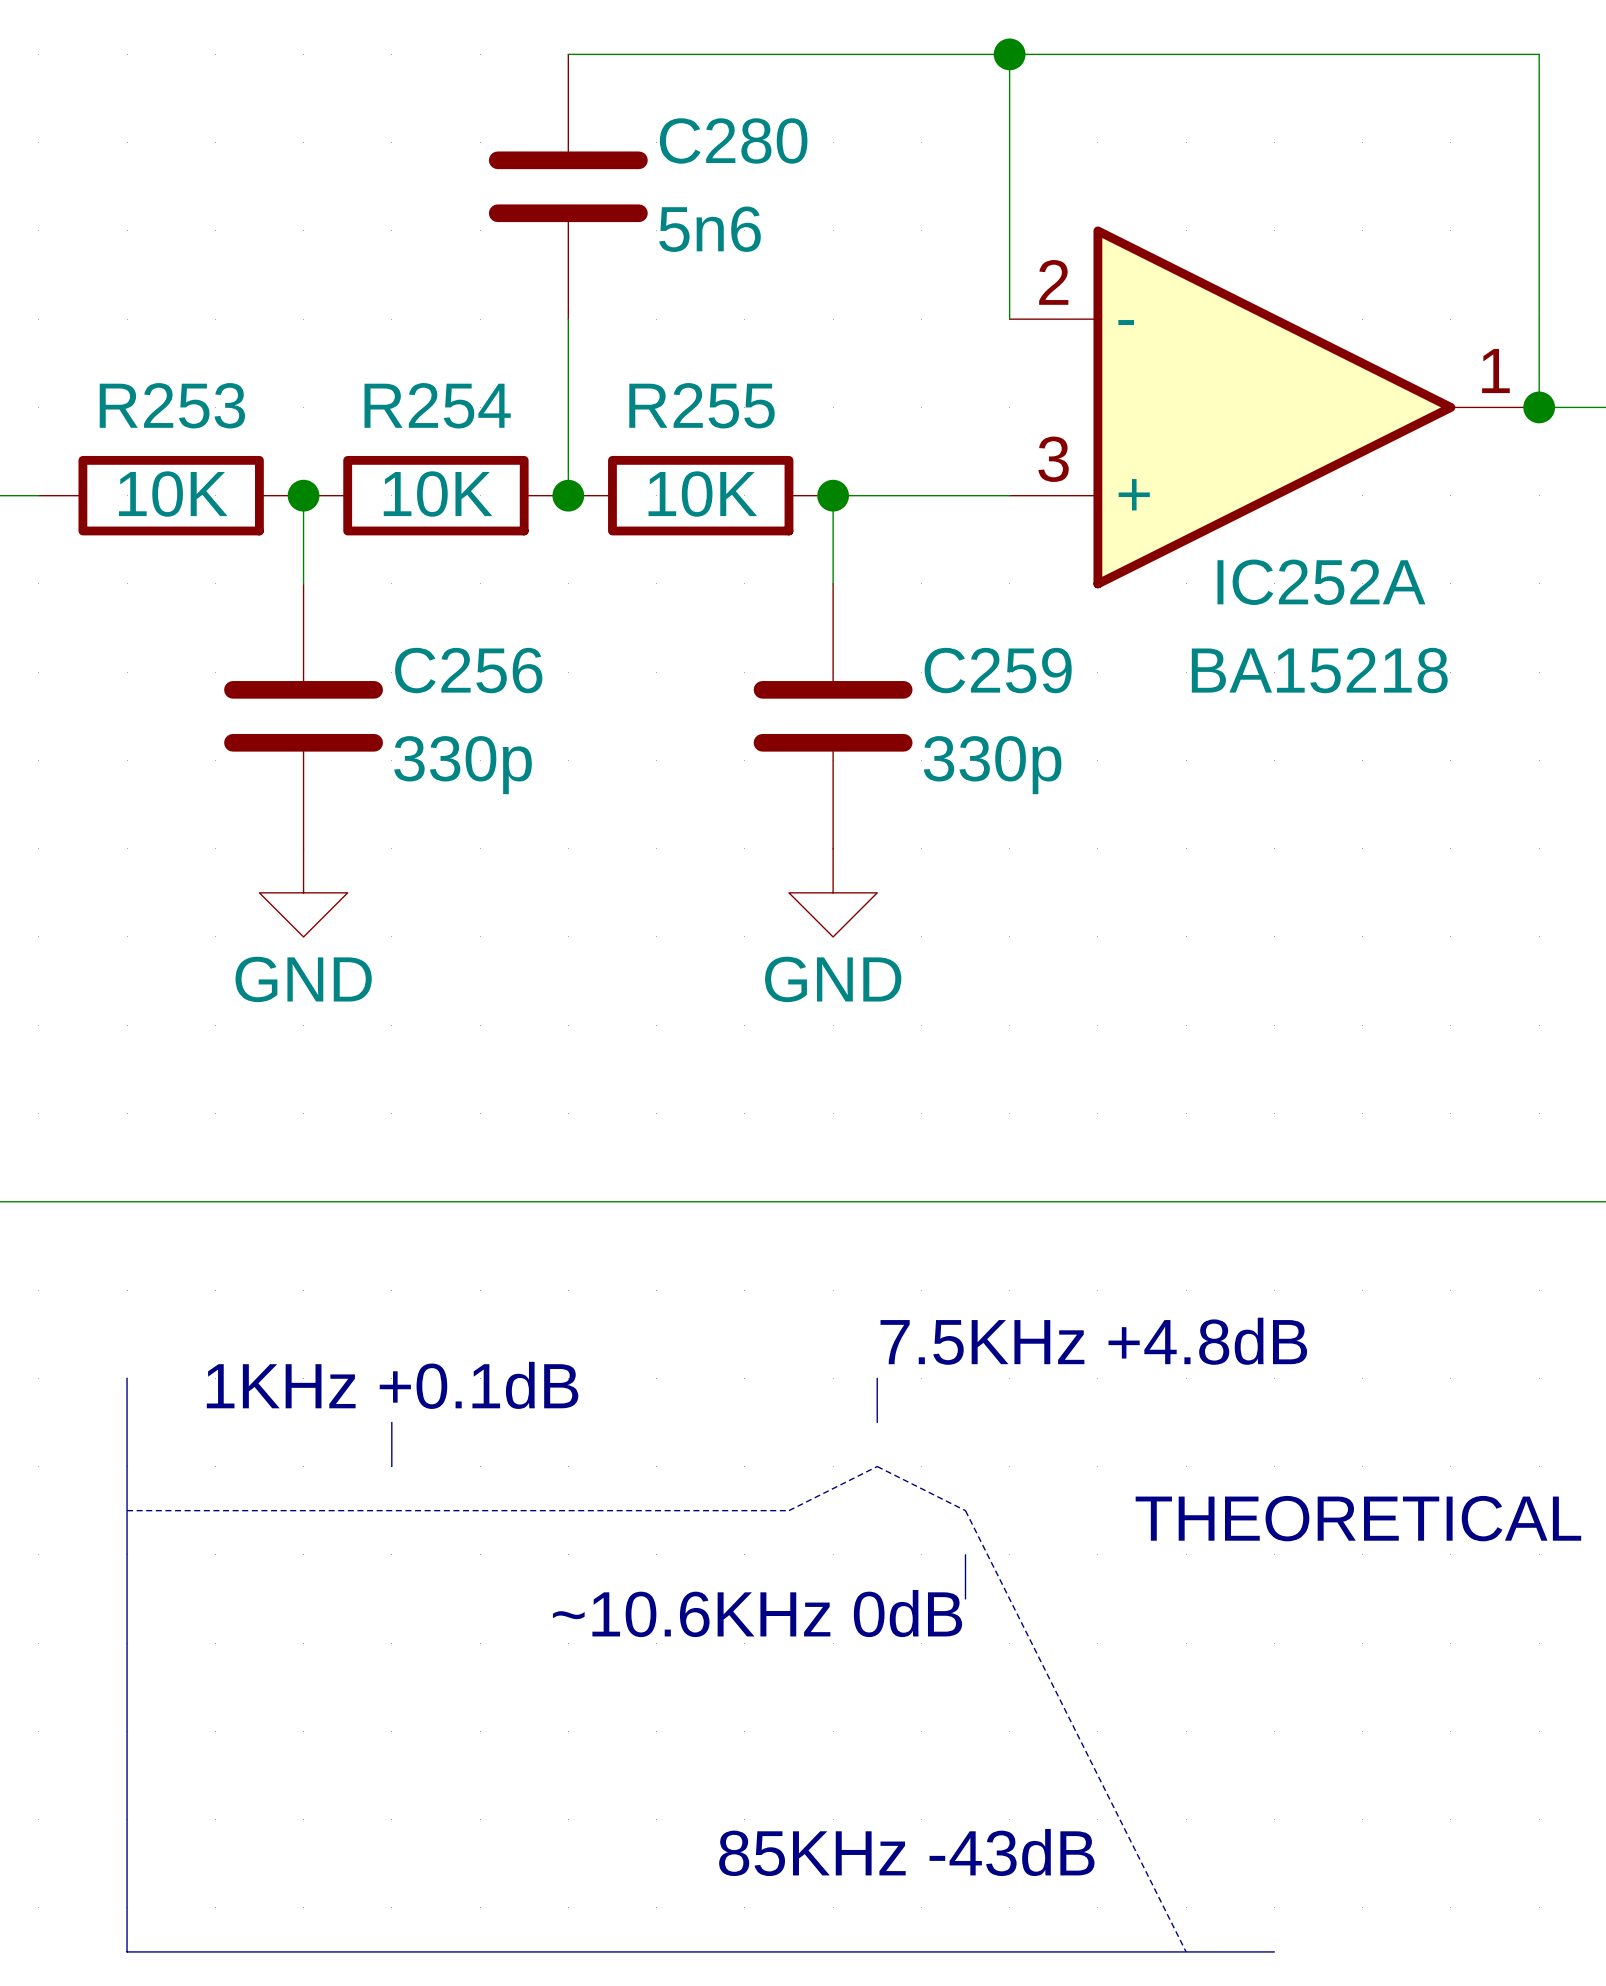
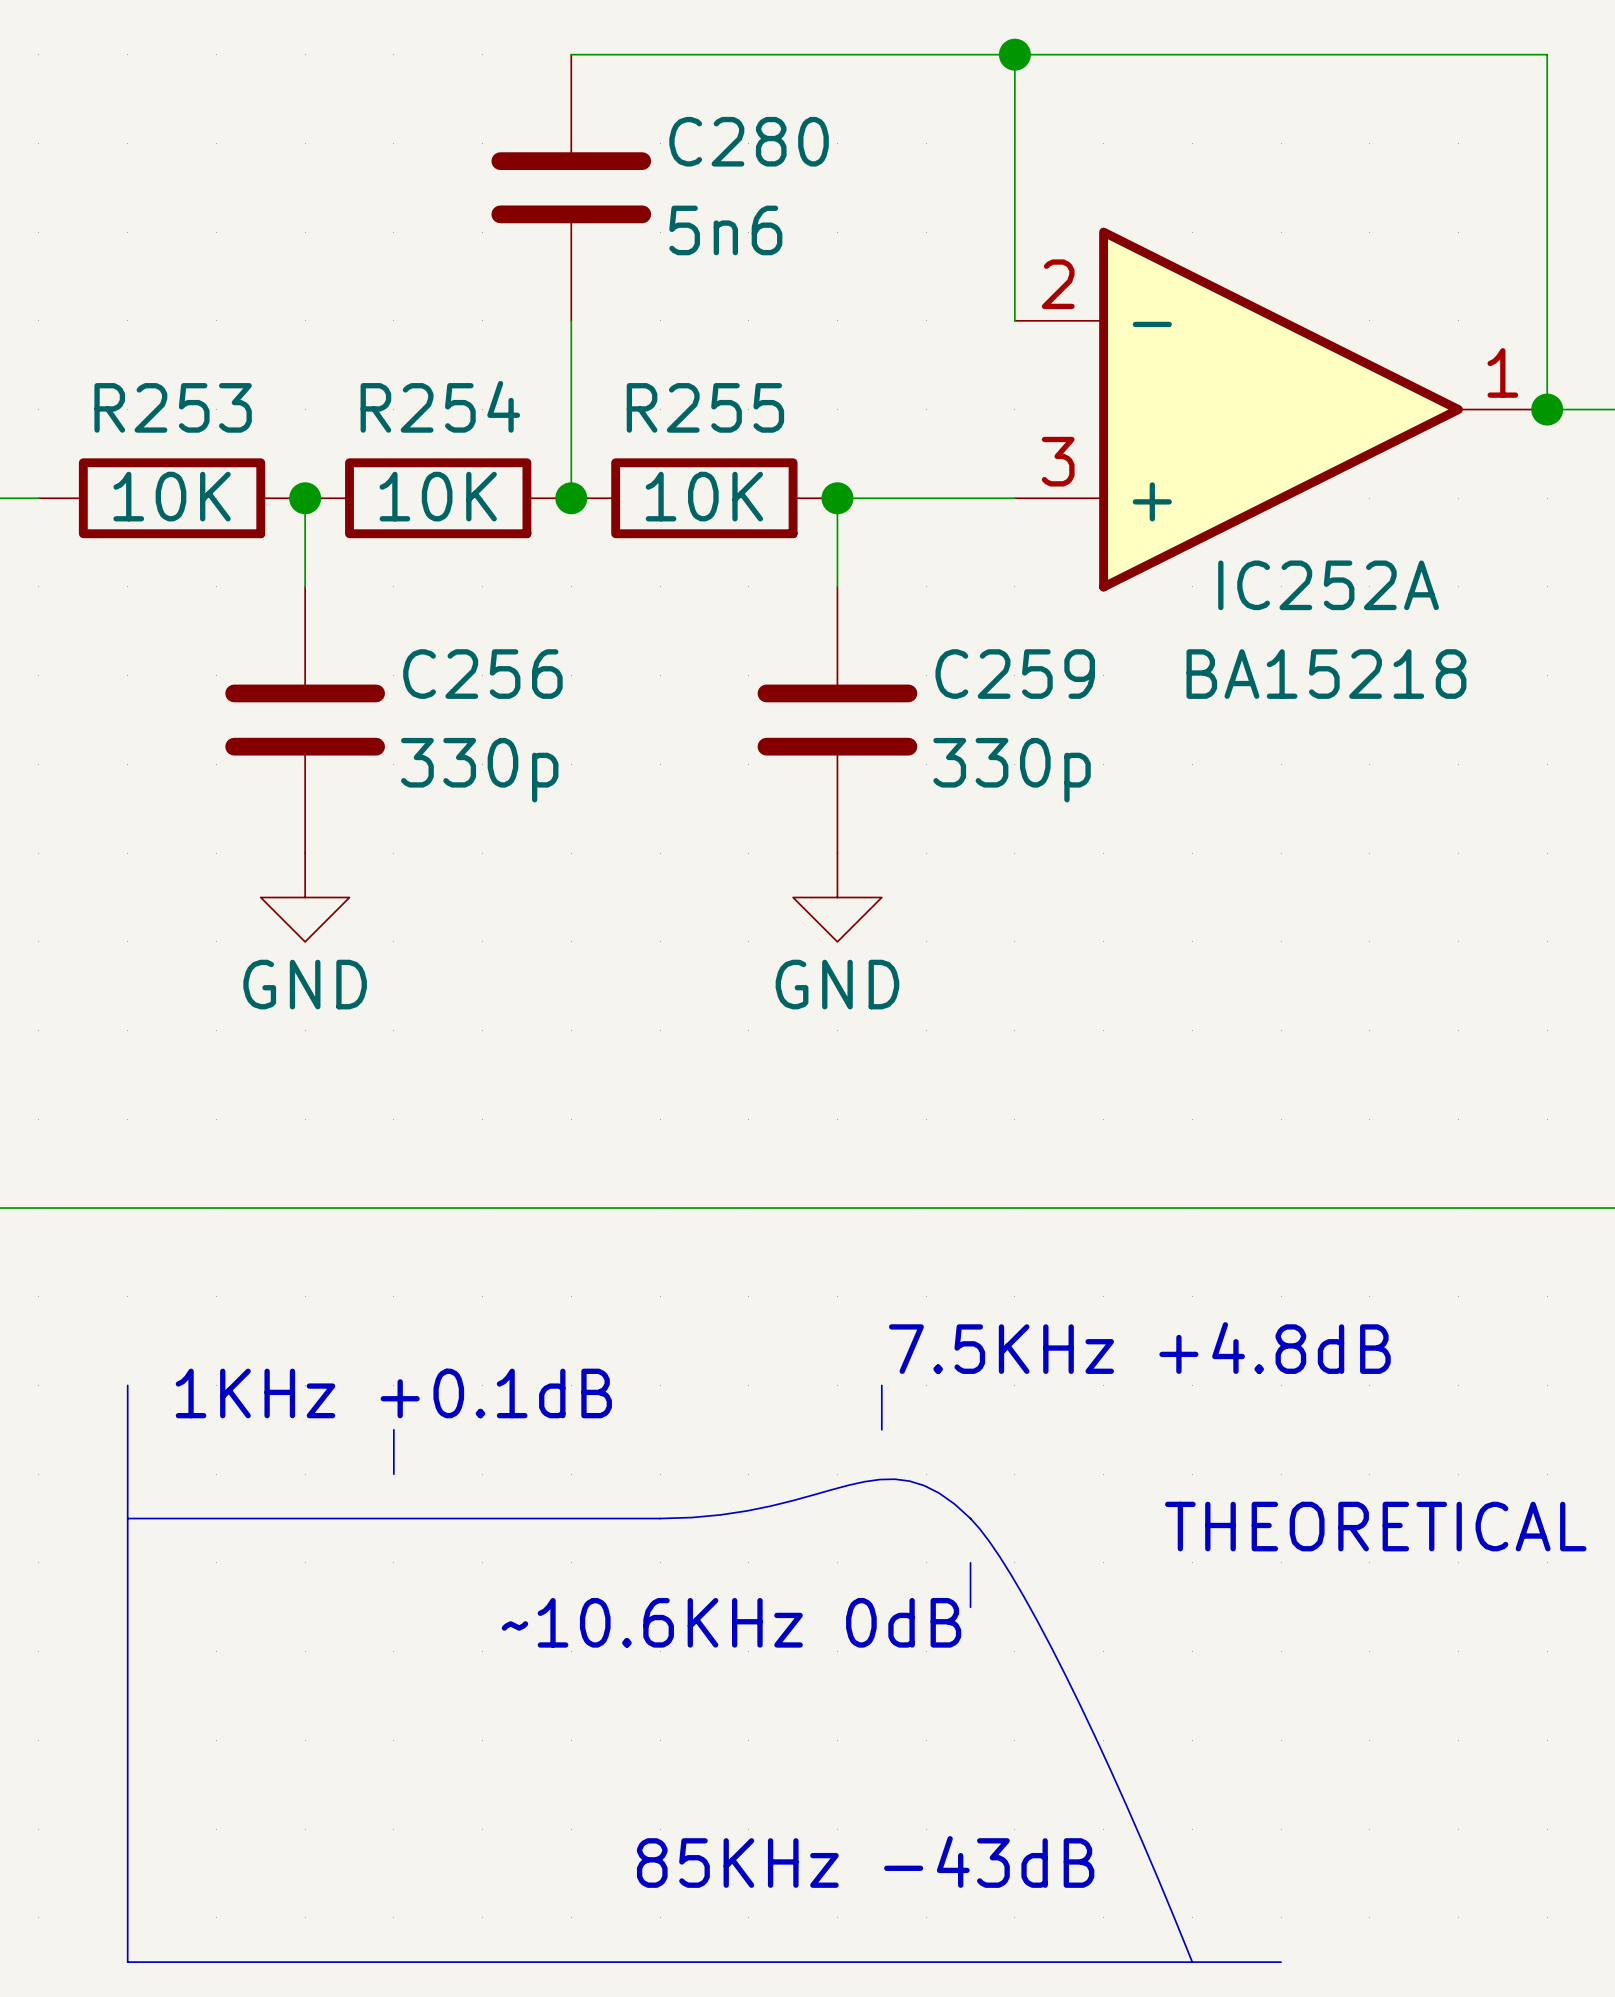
line: (127, 1510) (788, 1510) (877, 1466) (965, 1510) (1186, 1951) -> (127, 1518) (691, 1517) (746, 1510) (848, 1485) (880, 1479) (909, 1481) (924, 1485) (954, 1503) (970, 1518) (989, 1541) (1023, 1596) (1064, 1673) (1110, 1769) (1192, 1962)

